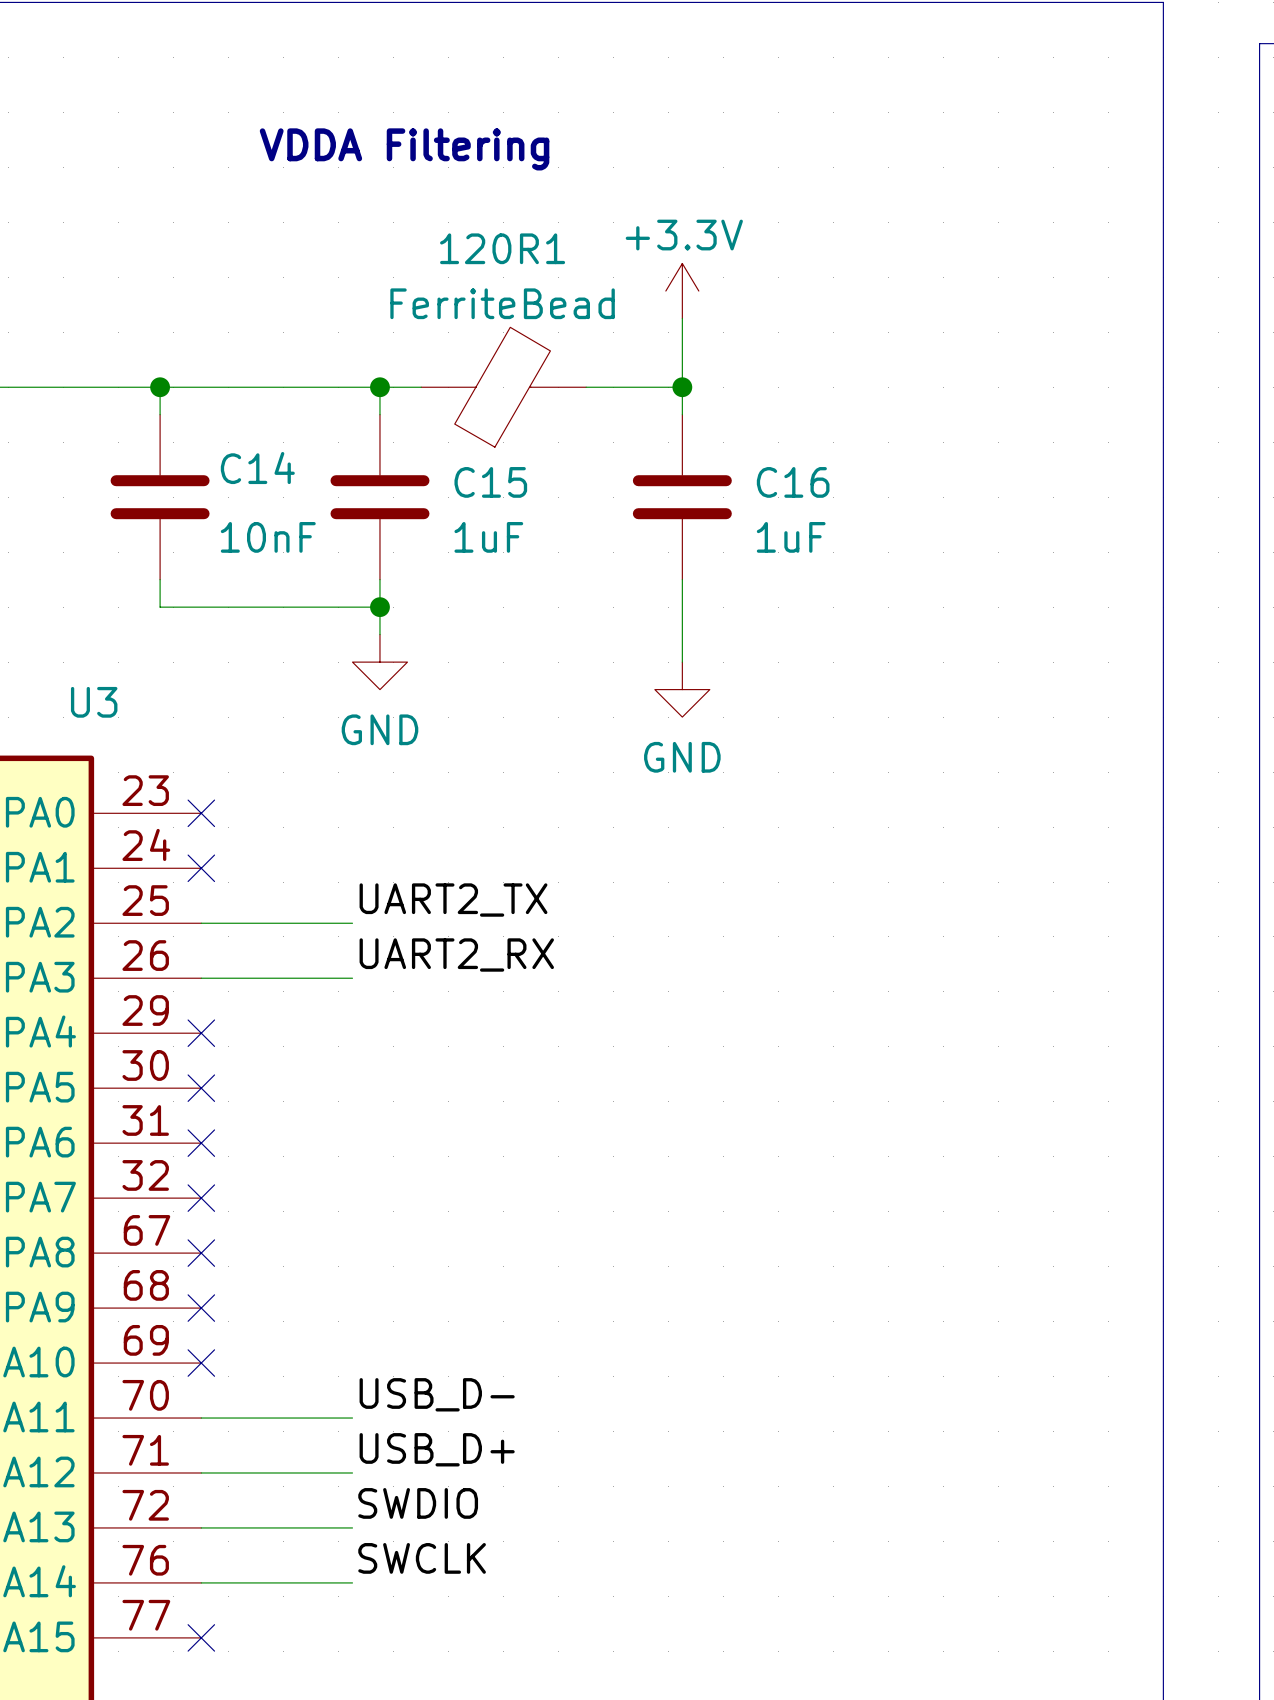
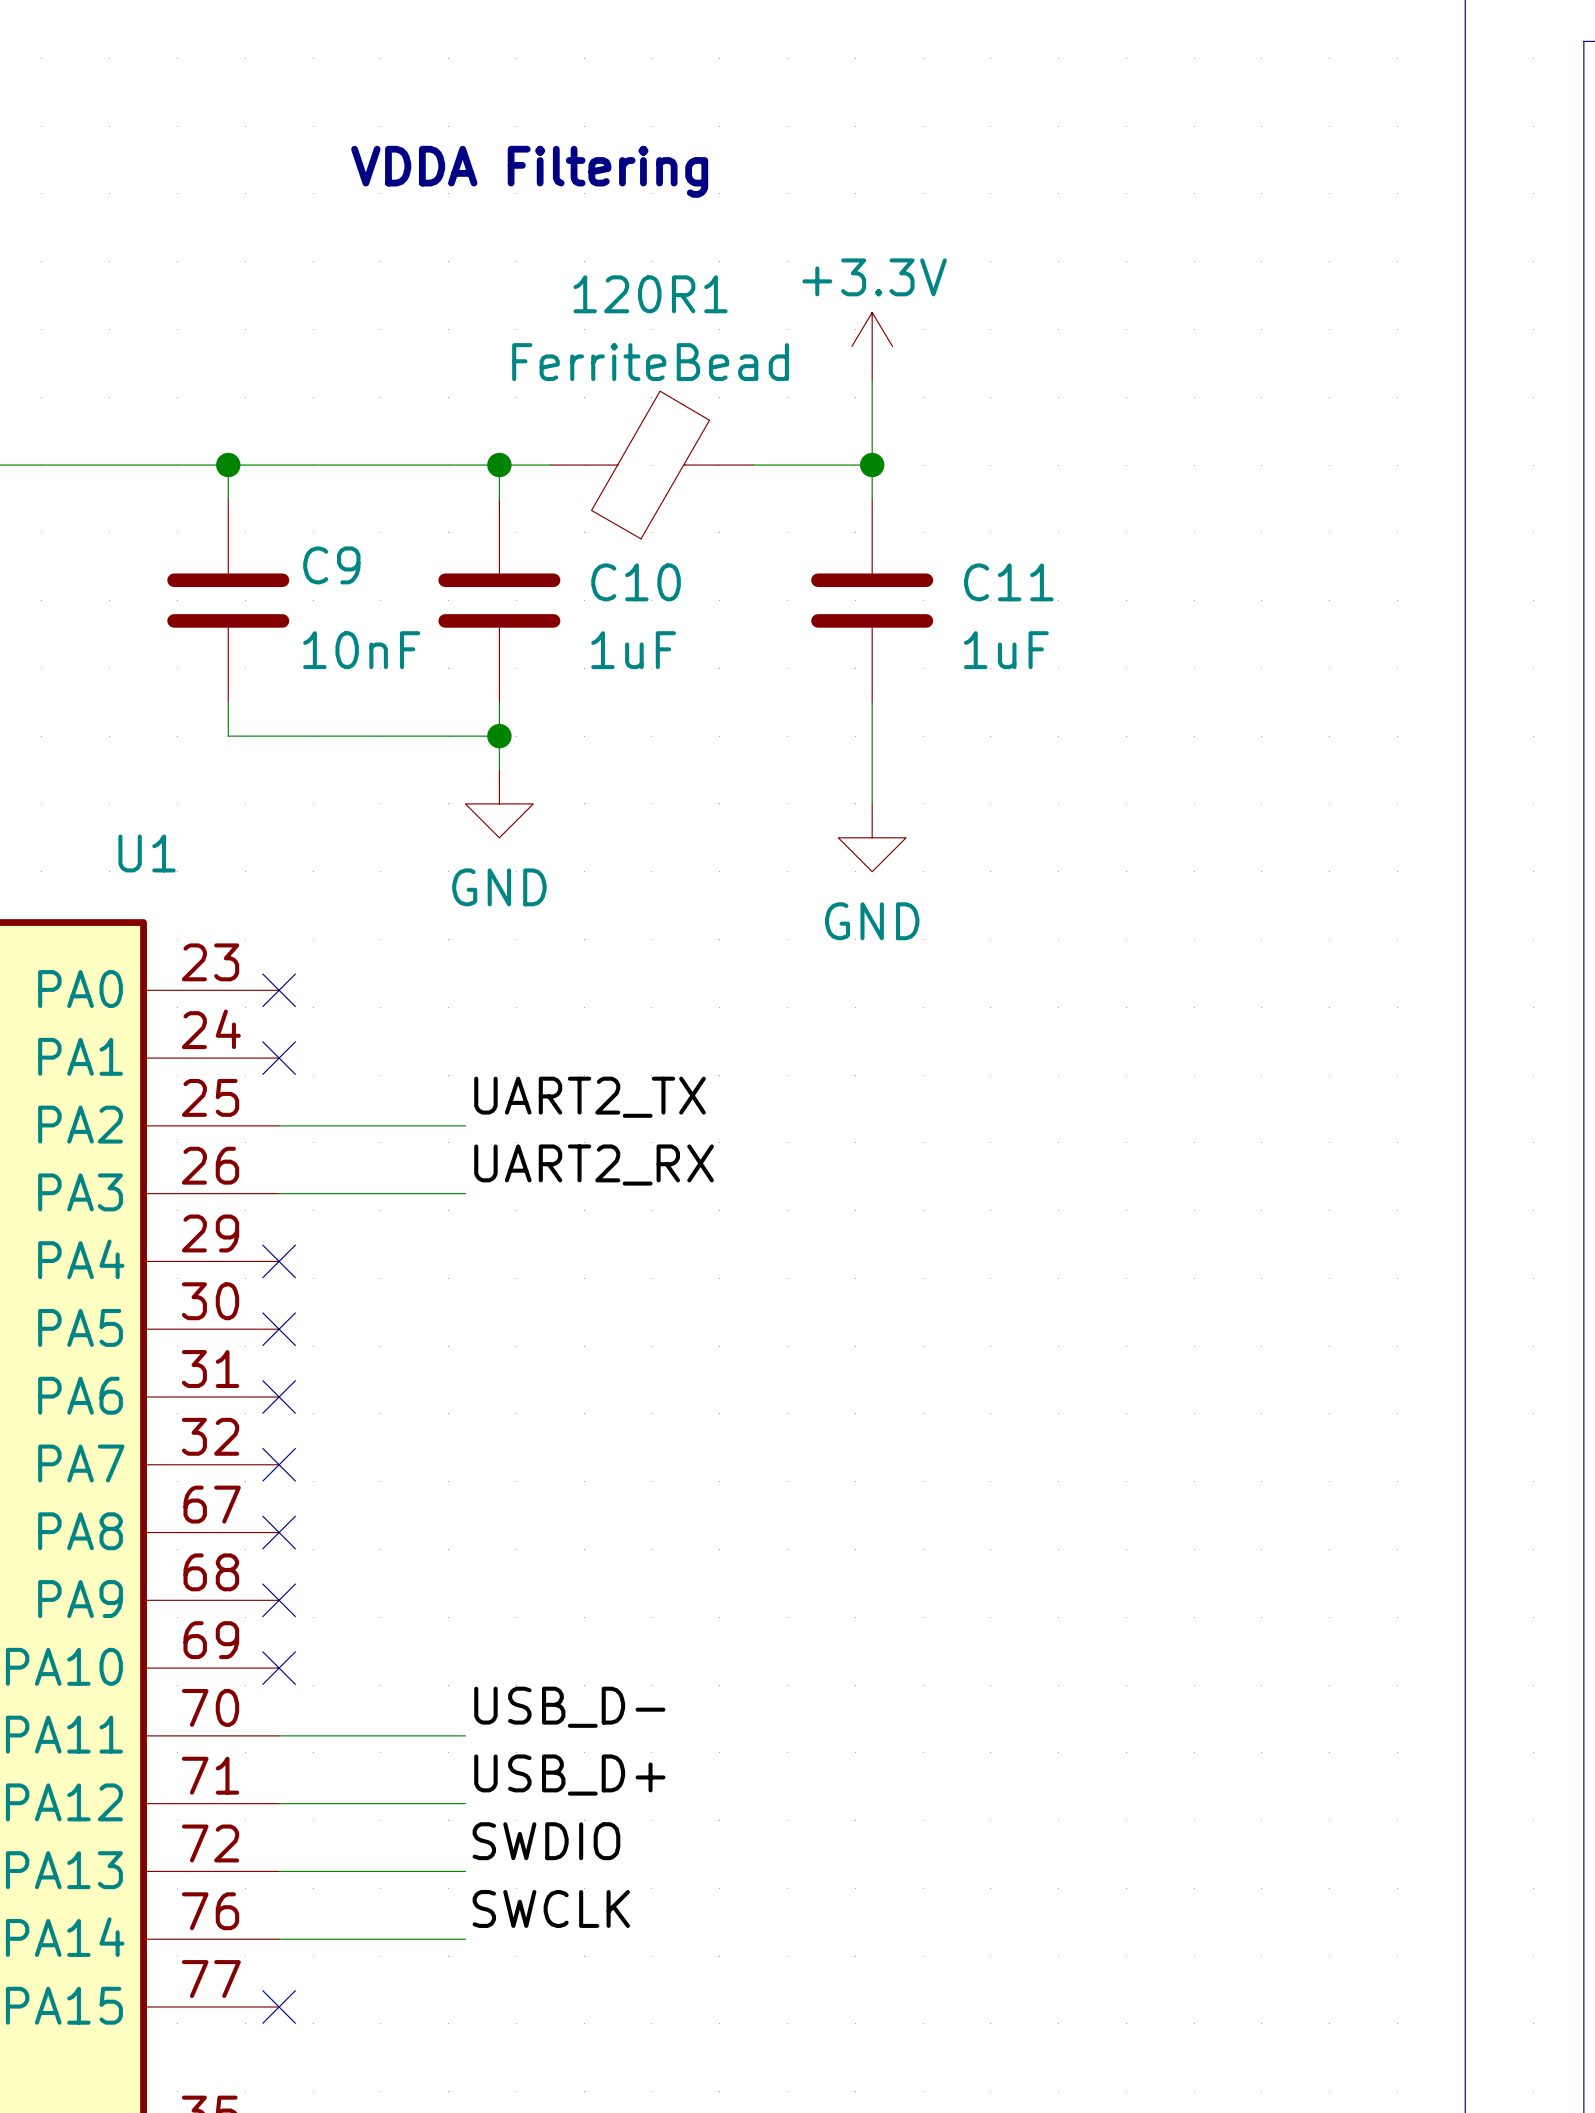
C14 name: C14 (257, 468) -> C9 (331, 565)
C15 name: C15 (490, 482) -> C10 (636, 582)
C16 name: C16 (793, 482) -> C11 (1008, 582)
U3 name: U3 (94, 702) -> U1 (147, 853)

